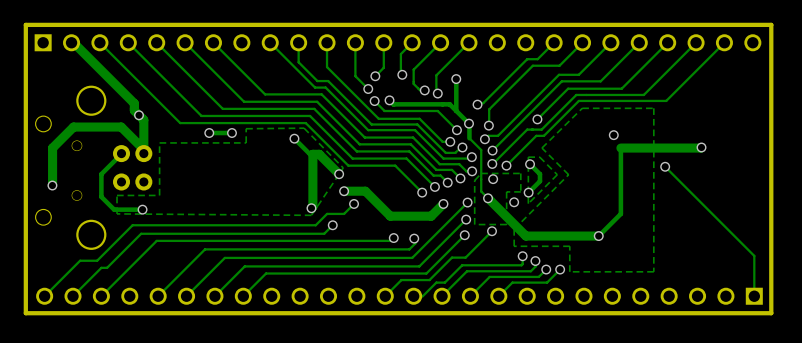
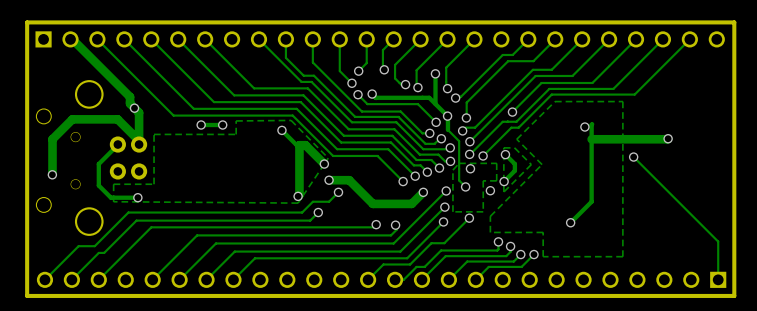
track: none -> (474, 39) (446, 67) (447, 88)
via: none -> (447, 88)
track: none -> (592, 124) (591, 139)
track: (488, 198) (525, 236) (598, 236) -> none

